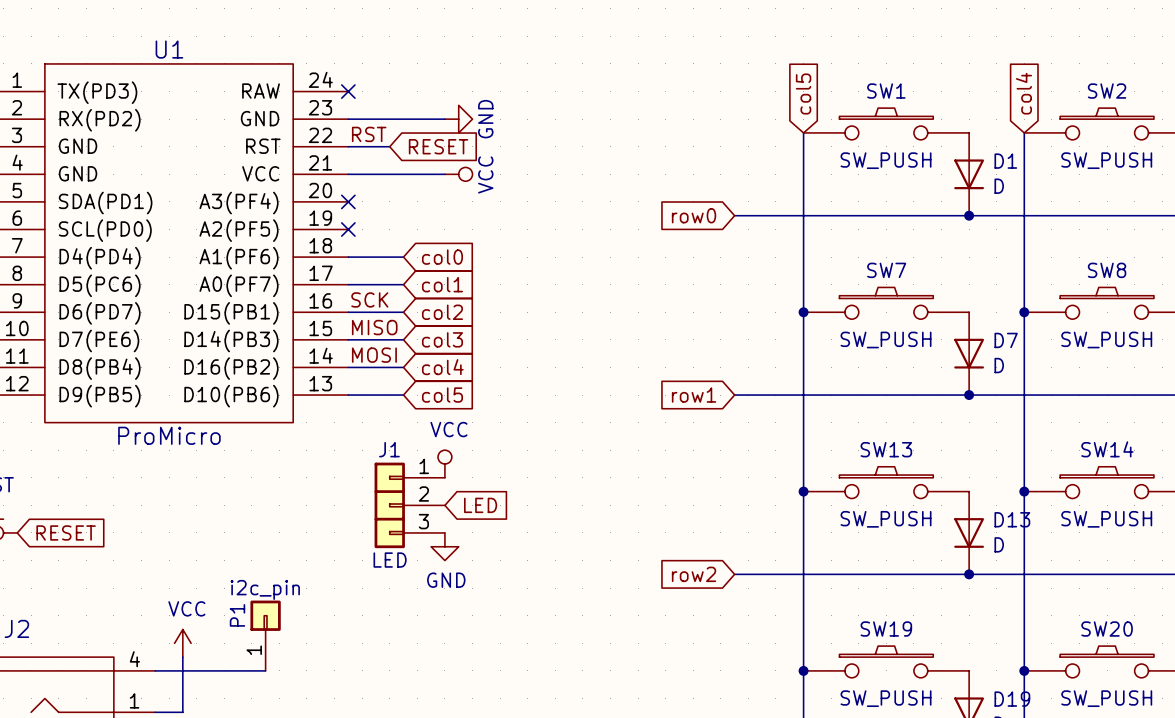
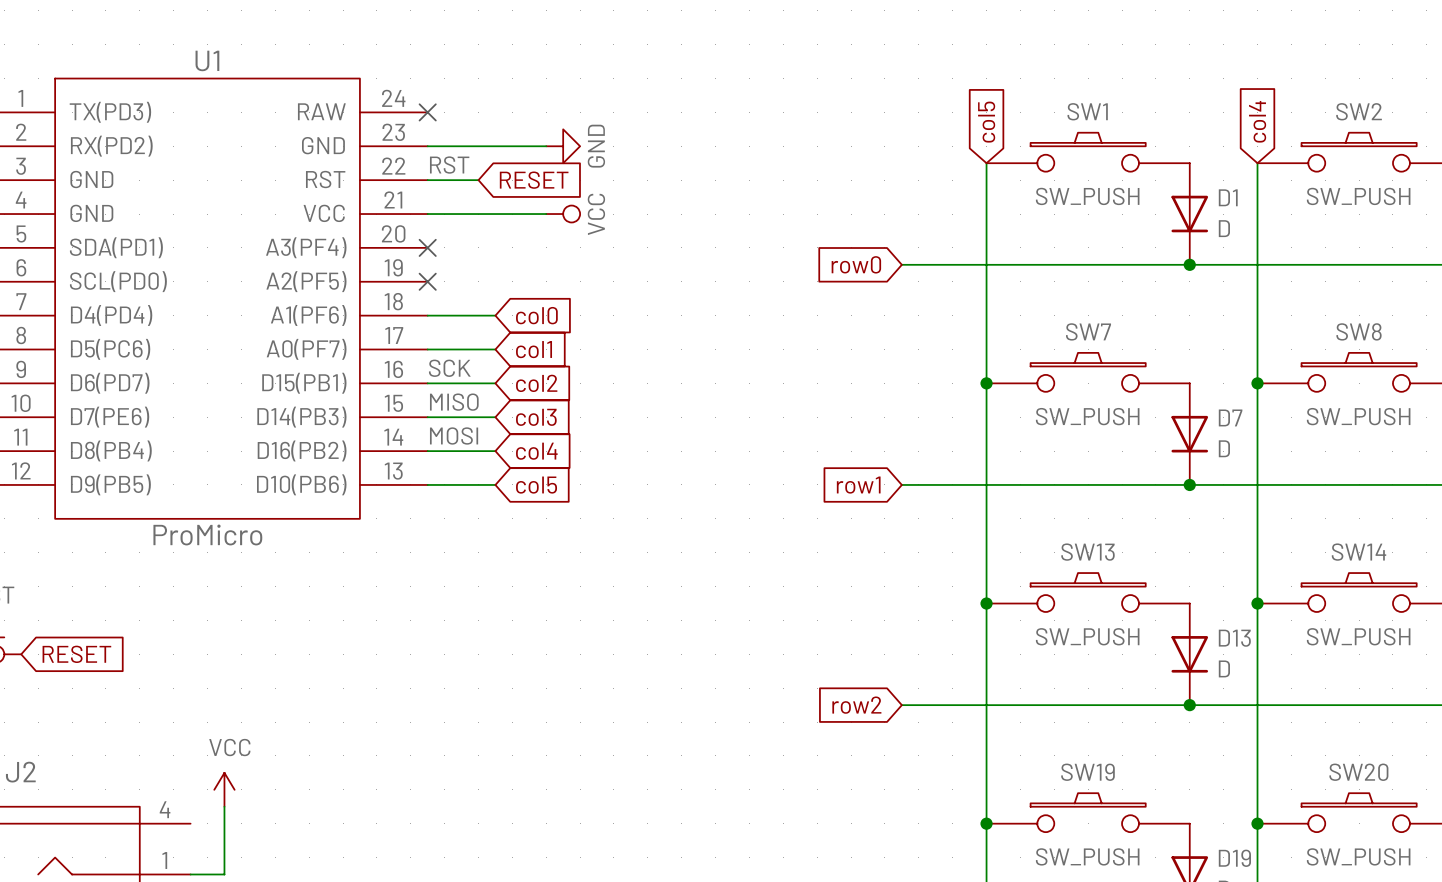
power symbol: VCC (444, 464) -> none
J1: LED (409, 505) -> none
global label: LED (480, 505) -> none
power symbol: GND (444, 546) -> none
P1: i2c_pin (265, 635) -> none
wire: (155, 670) (265, 670) -> none

